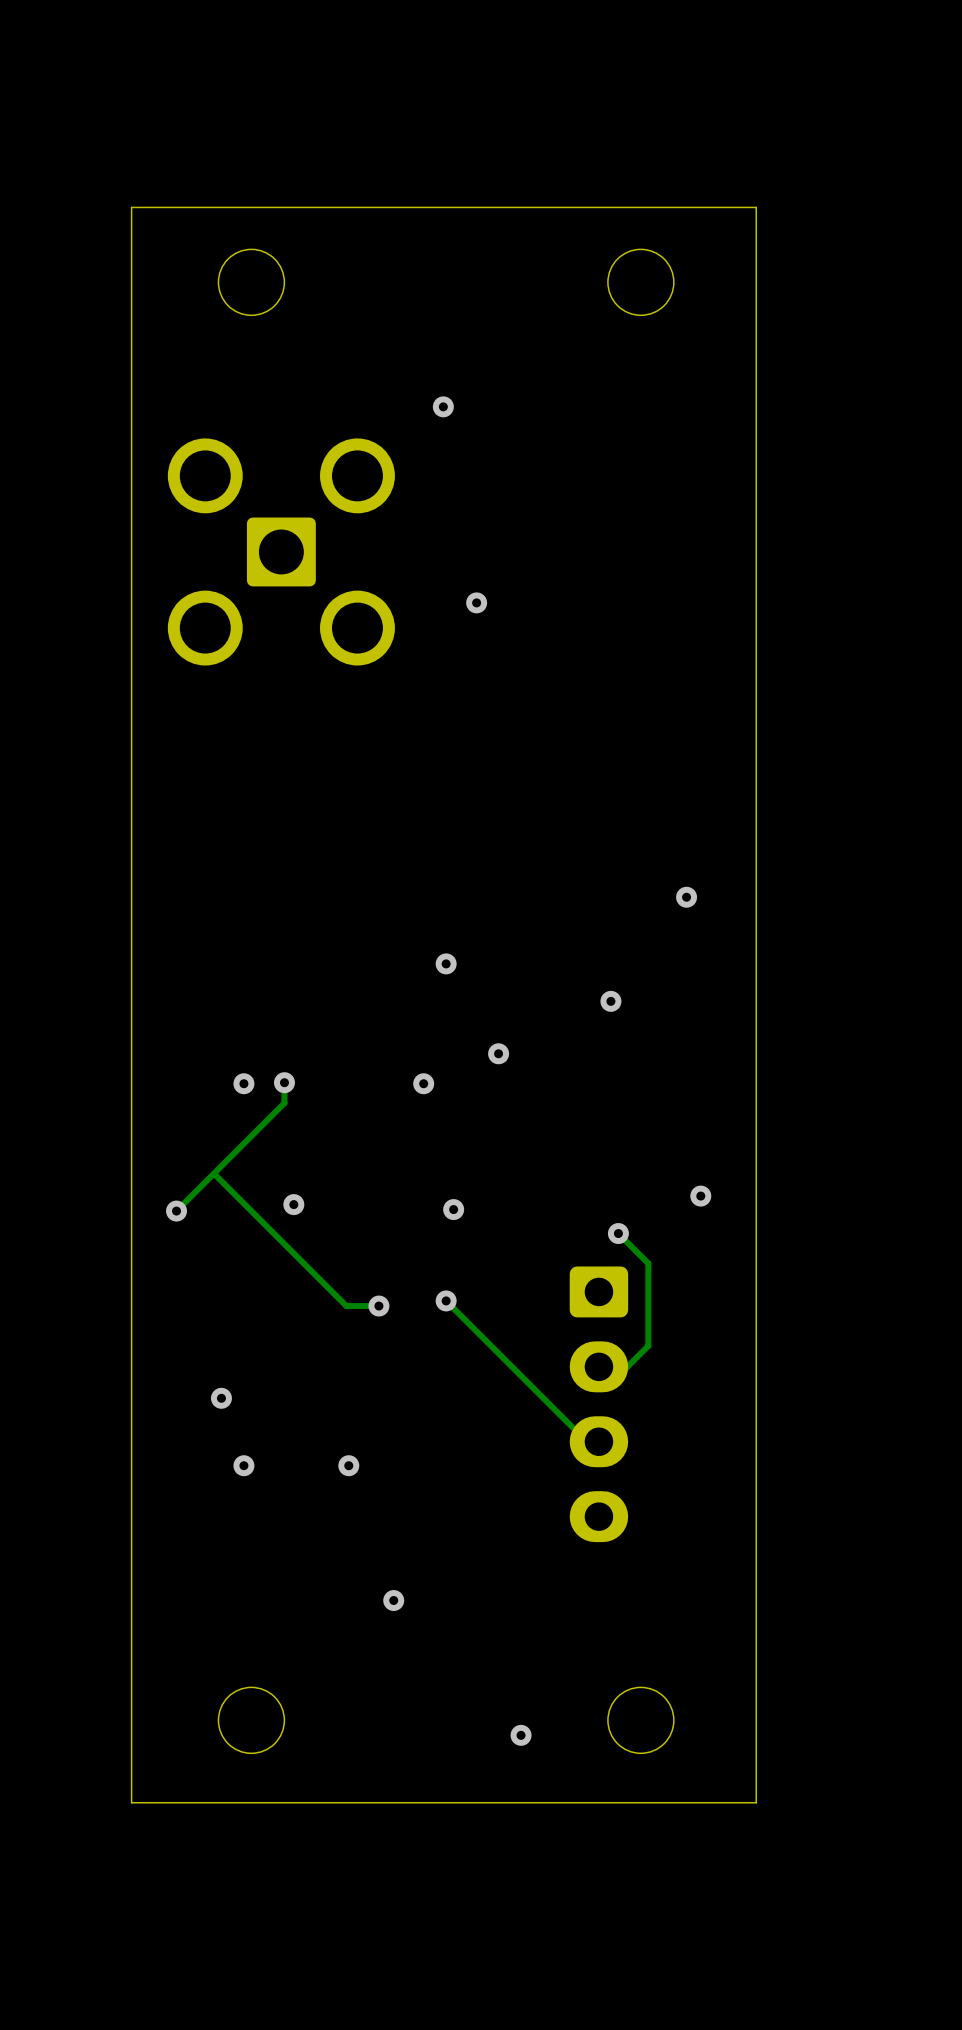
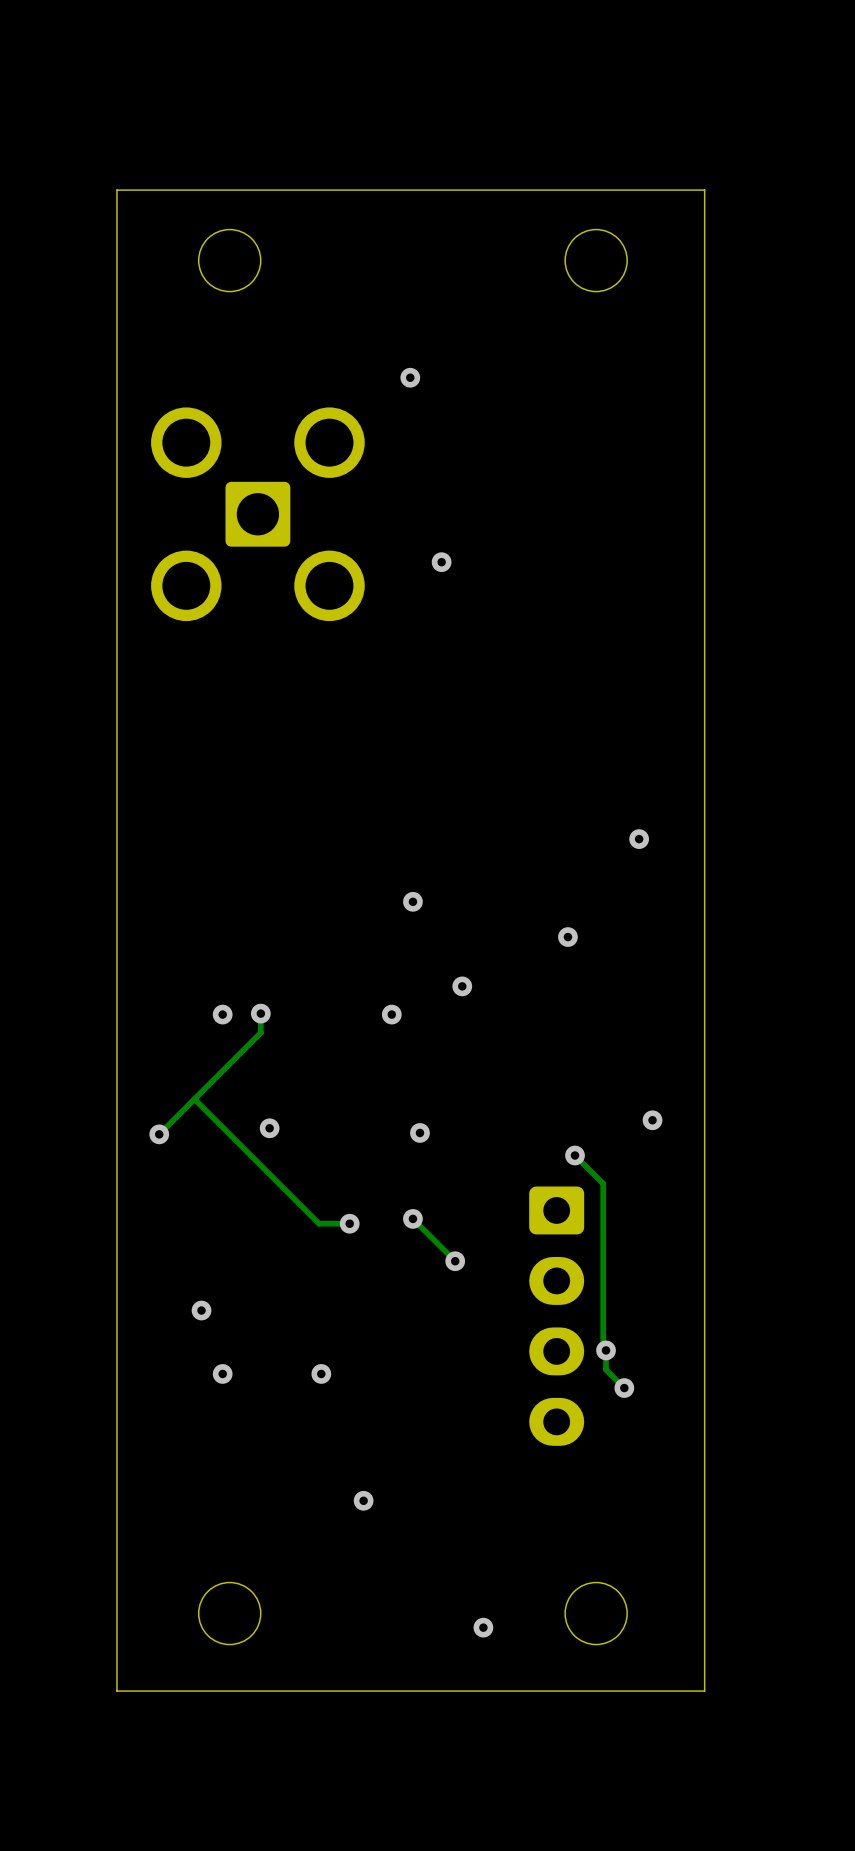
track: (491, 1345) (586, 1441) (598, 1441) -> none
via: none -> (455, 1261)
track: (648, 1345) (627, 1366) (598, 1366) -> (603, 1261) (603, 1347) (606, 1350) (606, 1369) (624, 1388)
via: none -> (606, 1350)
via: none -> (624, 1388)

